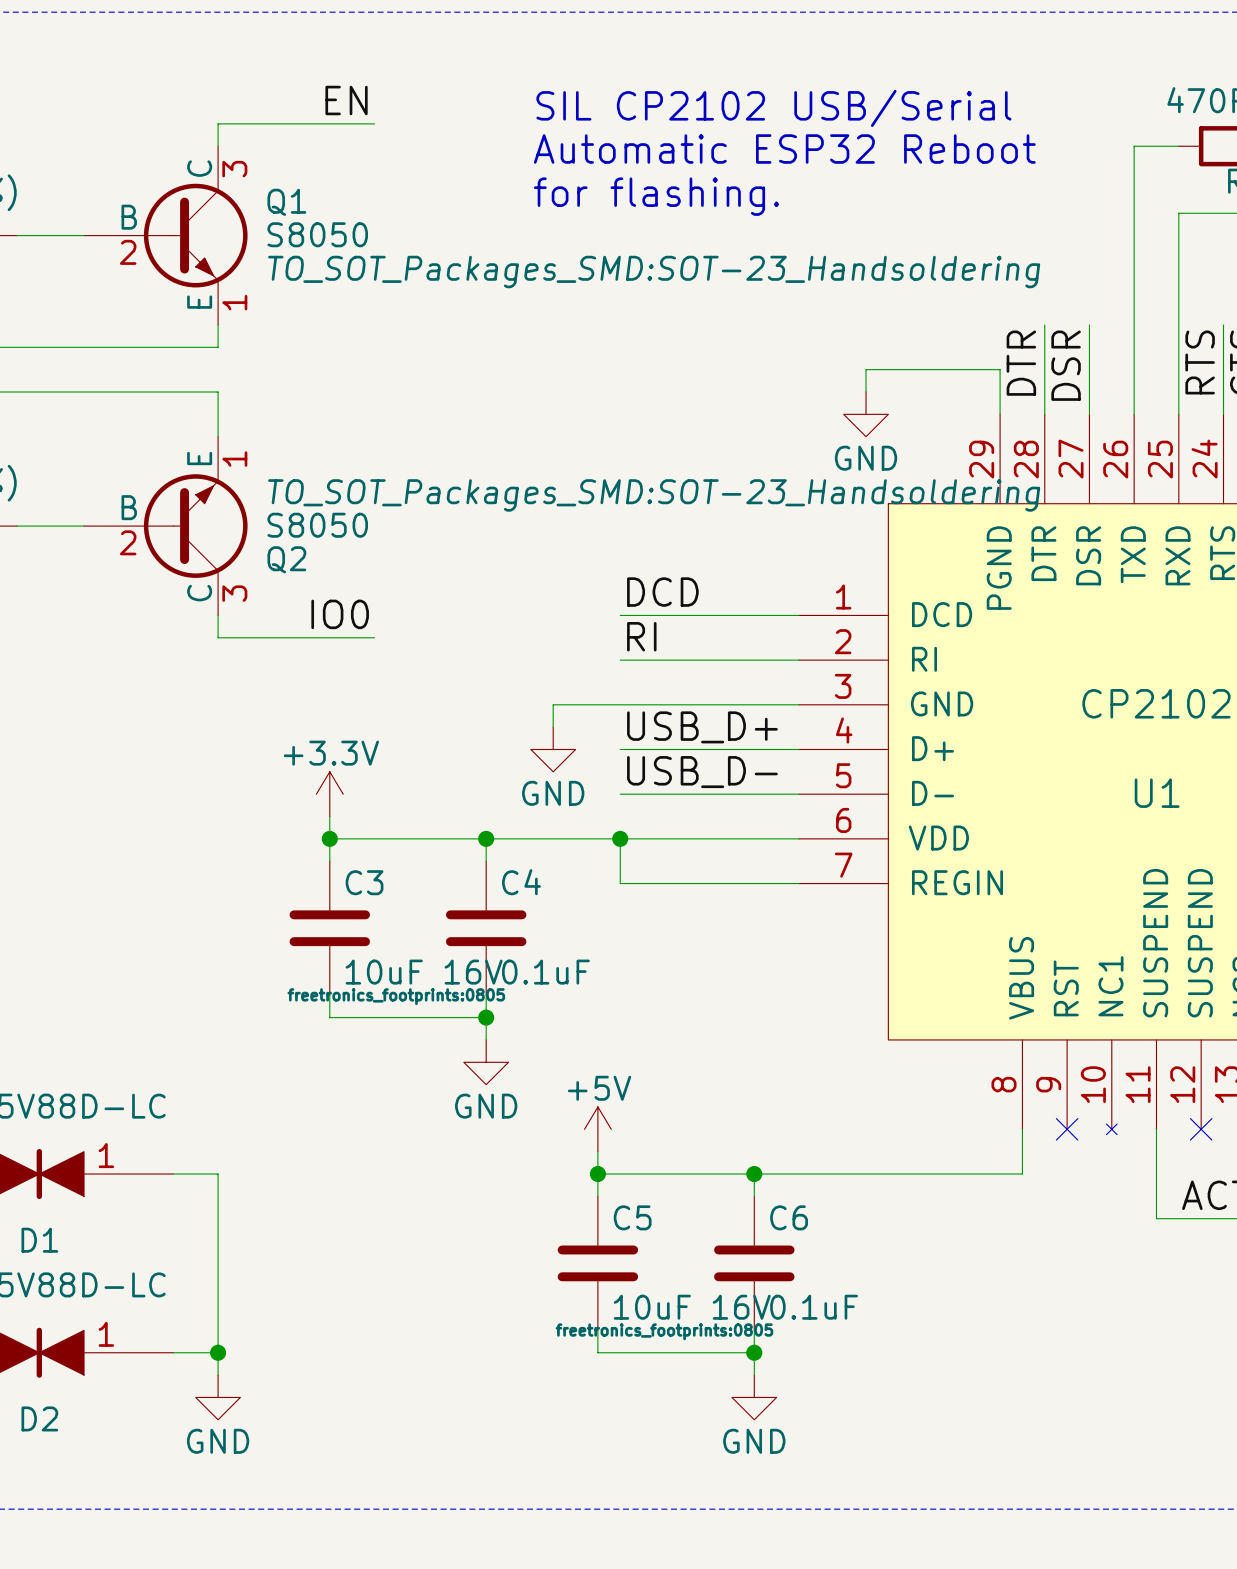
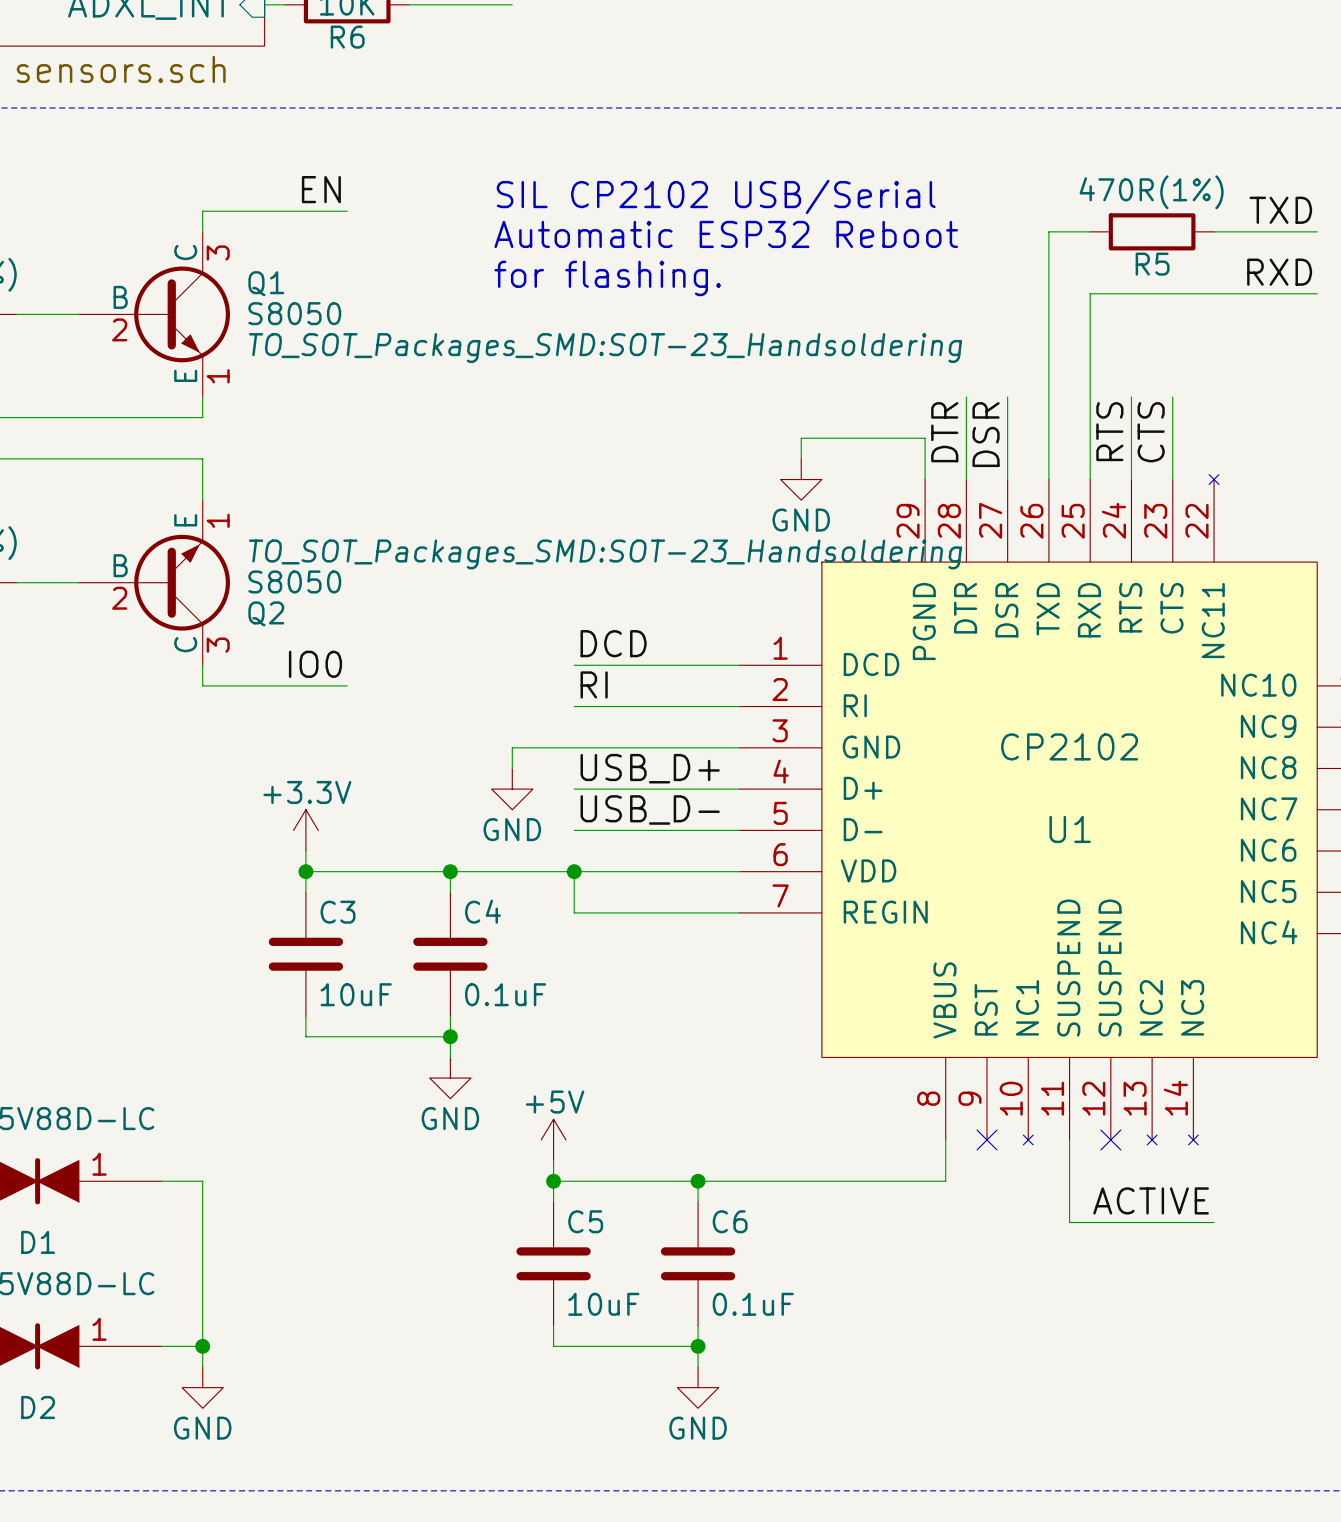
C3 value: 10uF 16V (424, 972) -> 10uF (356, 994)
C3 text: freetronics_footprints:0805 (396, 996) -> none
C5 value: 10uF 16V (692, 1307) -> 10uF (603, 1304)
C5 text: freetronics_footprints:0805 (664, 1331) -> none

